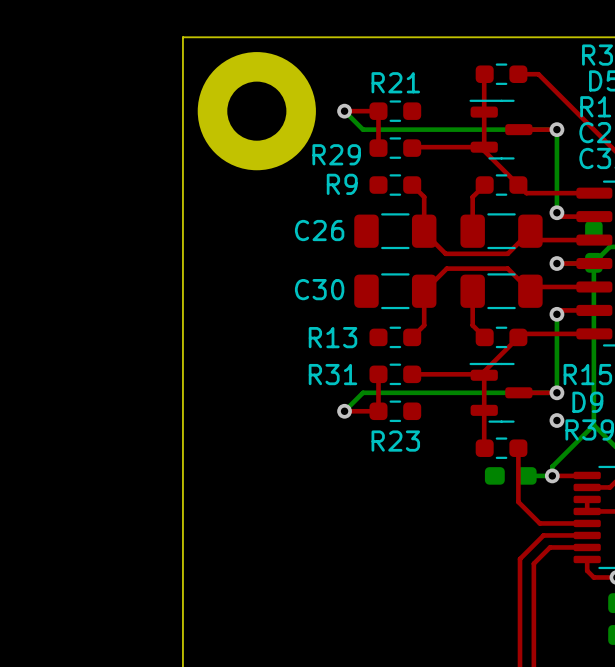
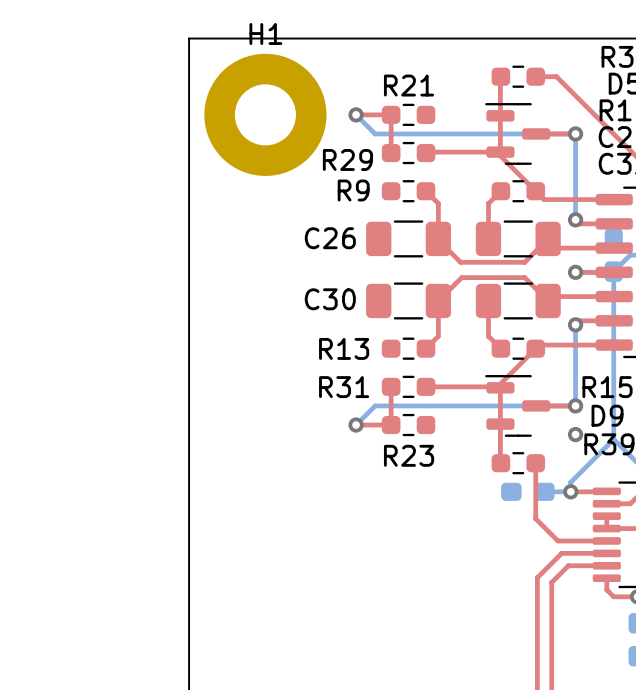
H1 name: none -> H1 (265, 34)

